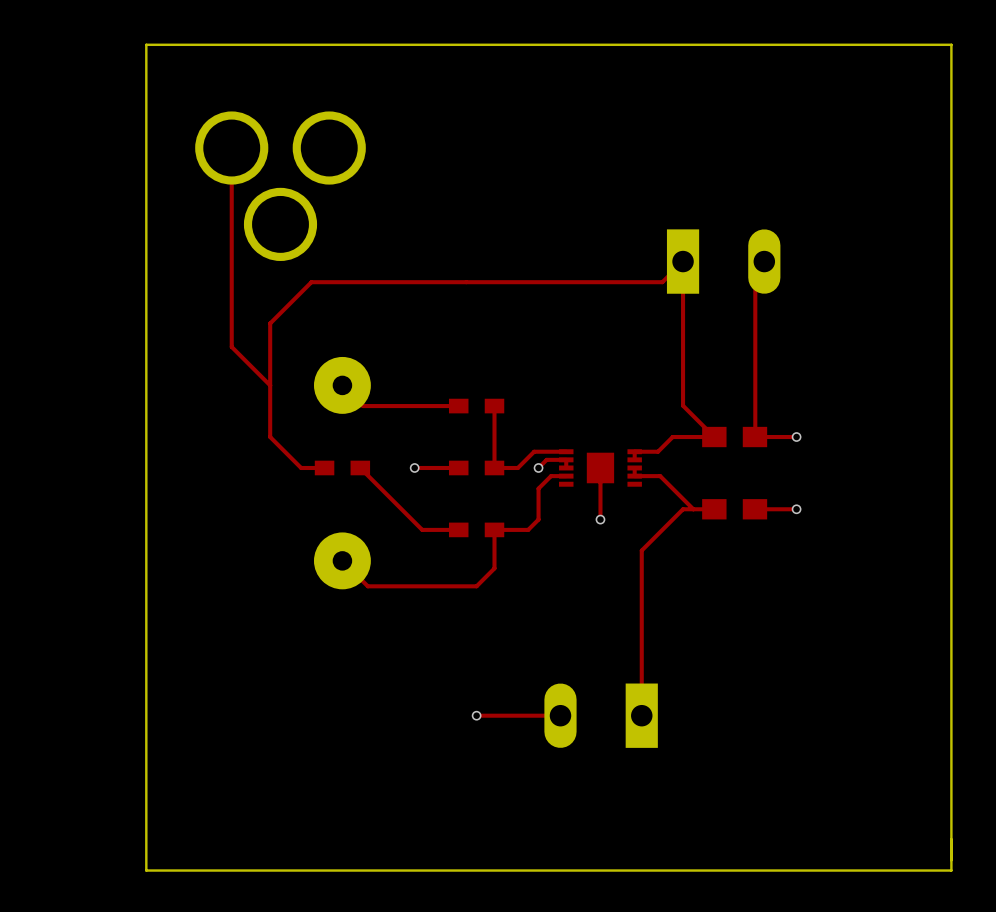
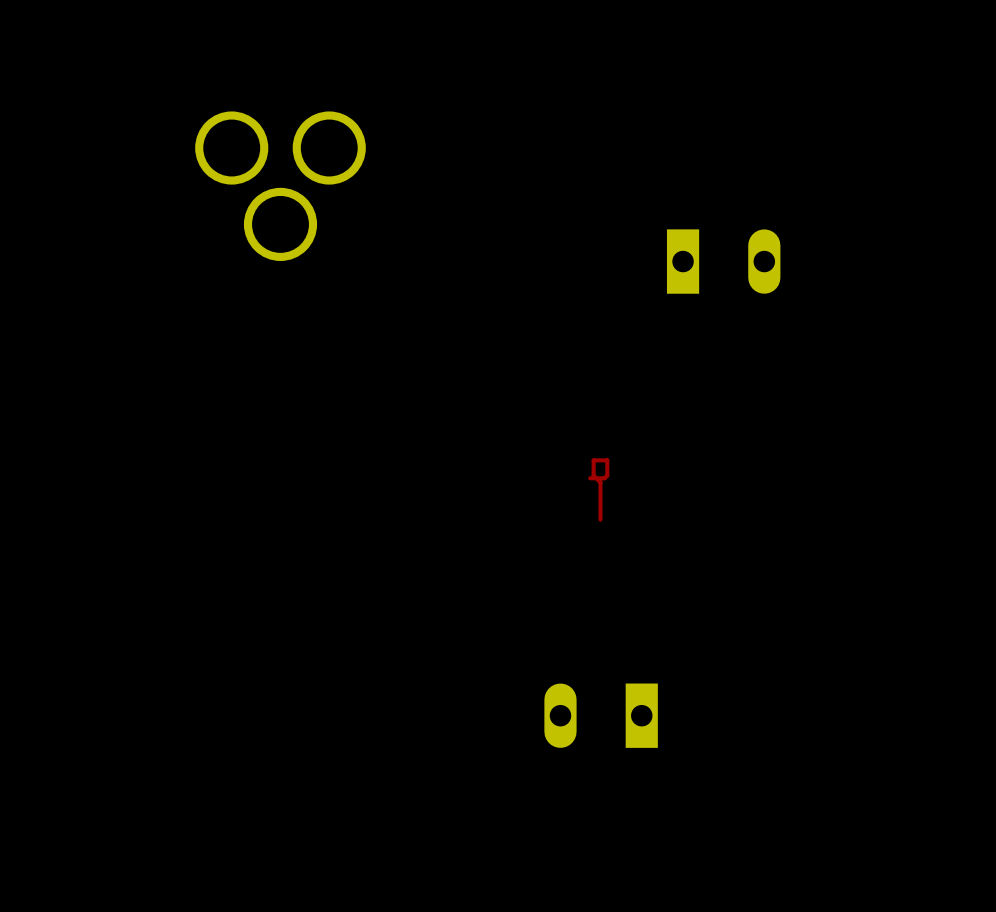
board edge: (951, 44) (951, 870) (146, 870) (146, 44) (951, 44) -> none
top track: (231, 148) (231, 346) (270, 385) -> none
top track: (764, 261) (755, 270) (755, 437) (796, 437) -> none
top track: (342, 385) (363, 406) (458, 406) -> none
part: (342, 385) -> none
part: (476, 406) -> none
top track: (494, 406) (494, 467) (517, 467) (534, 451) (566, 451) -> none
part: (734, 437) -> none
via: (796, 437) -> none
top track: (634, 459) (634, 451) (658, 451) (672, 437) (714, 437) (683, 405) (683, 261) (662, 282) (311, 282) (270, 323) (270, 437) (301, 467) (324, 467) -> none
part: (342, 467) -> none
top track: (360, 467) (422, 529) (458, 529) -> none
via: (414, 467) -> none
top track: (458, 467) (414, 467) -> none
part: (476, 467) -> none
via: (538, 467) -> none
top track: (566, 467) (566, 459) (546, 459) (538, 467) -> none
part: (600, 467) -> none
top track: (634, 467) (634, 476) (660, 476) (693, 509) -> none
top track: (566, 476) (551, 476) (538, 488) (538, 519) (528, 529) (494, 529) (494, 568) (476, 586) (367, 586) (342, 560) -> none
top track: (714, 509) (683, 509) (641, 550) (641, 715) -> none
part: (734, 509) -> none
top track: (796, 509) (755, 509) -> none
via: (796, 509) -> none
via: (600, 519) -> none
part: (476, 529) -> none
part: (342, 560) -> none
via: (476, 715) -> none
top track: (560, 715) (476, 715) -> none

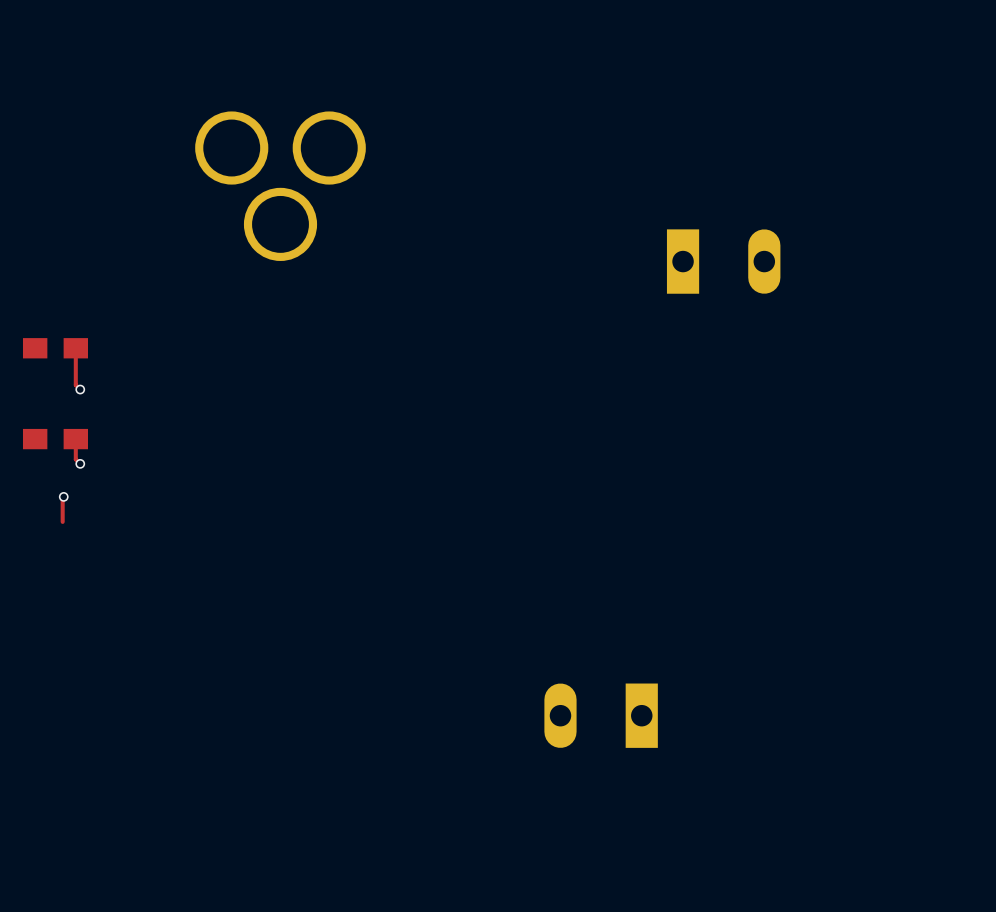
part: none -> (55, 348)
top track: none -> (75, 348) (75, 385) (80, 389)
via: none -> (80, 389)
part: none -> (55, 439)
top track: none -> (75, 439) (75, 459) (80, 463)
via: none -> (80, 463)
top track: (590, 478) (604, 478) (607, 475) (607, 460) (593, 460) (593, 475) (600, 482) (600, 519) -> none
top track: none -> (63, 496) (62, 521)
via: none -> (63, 496)

